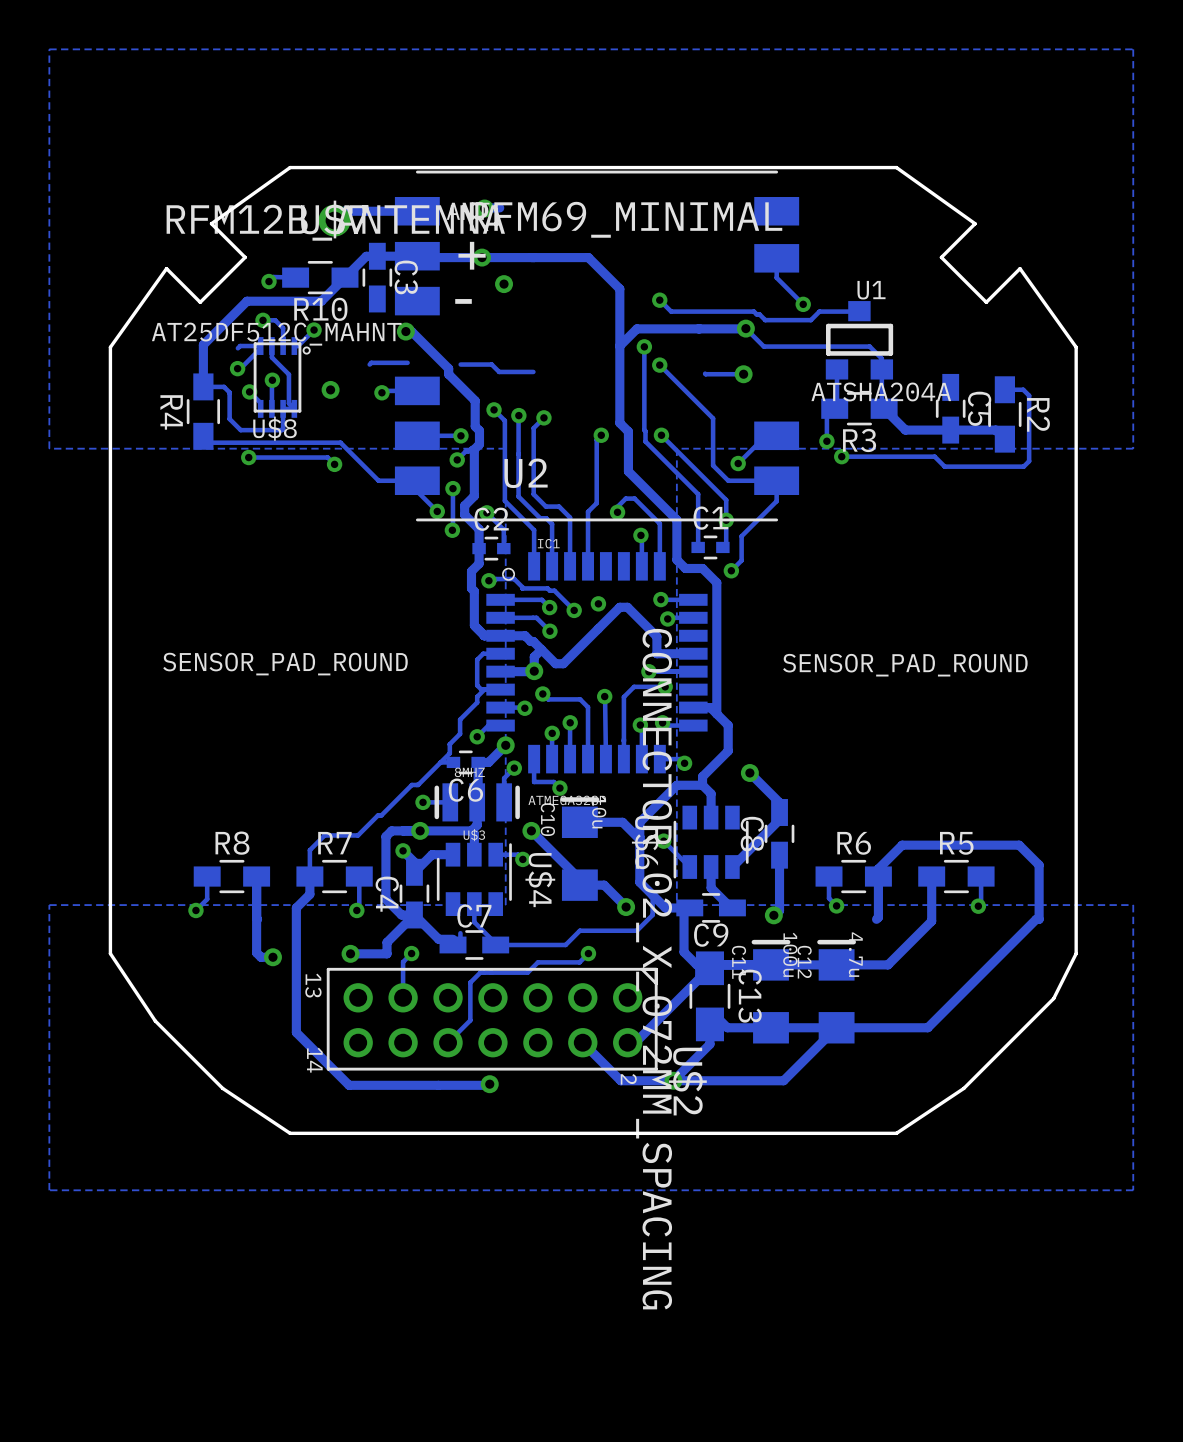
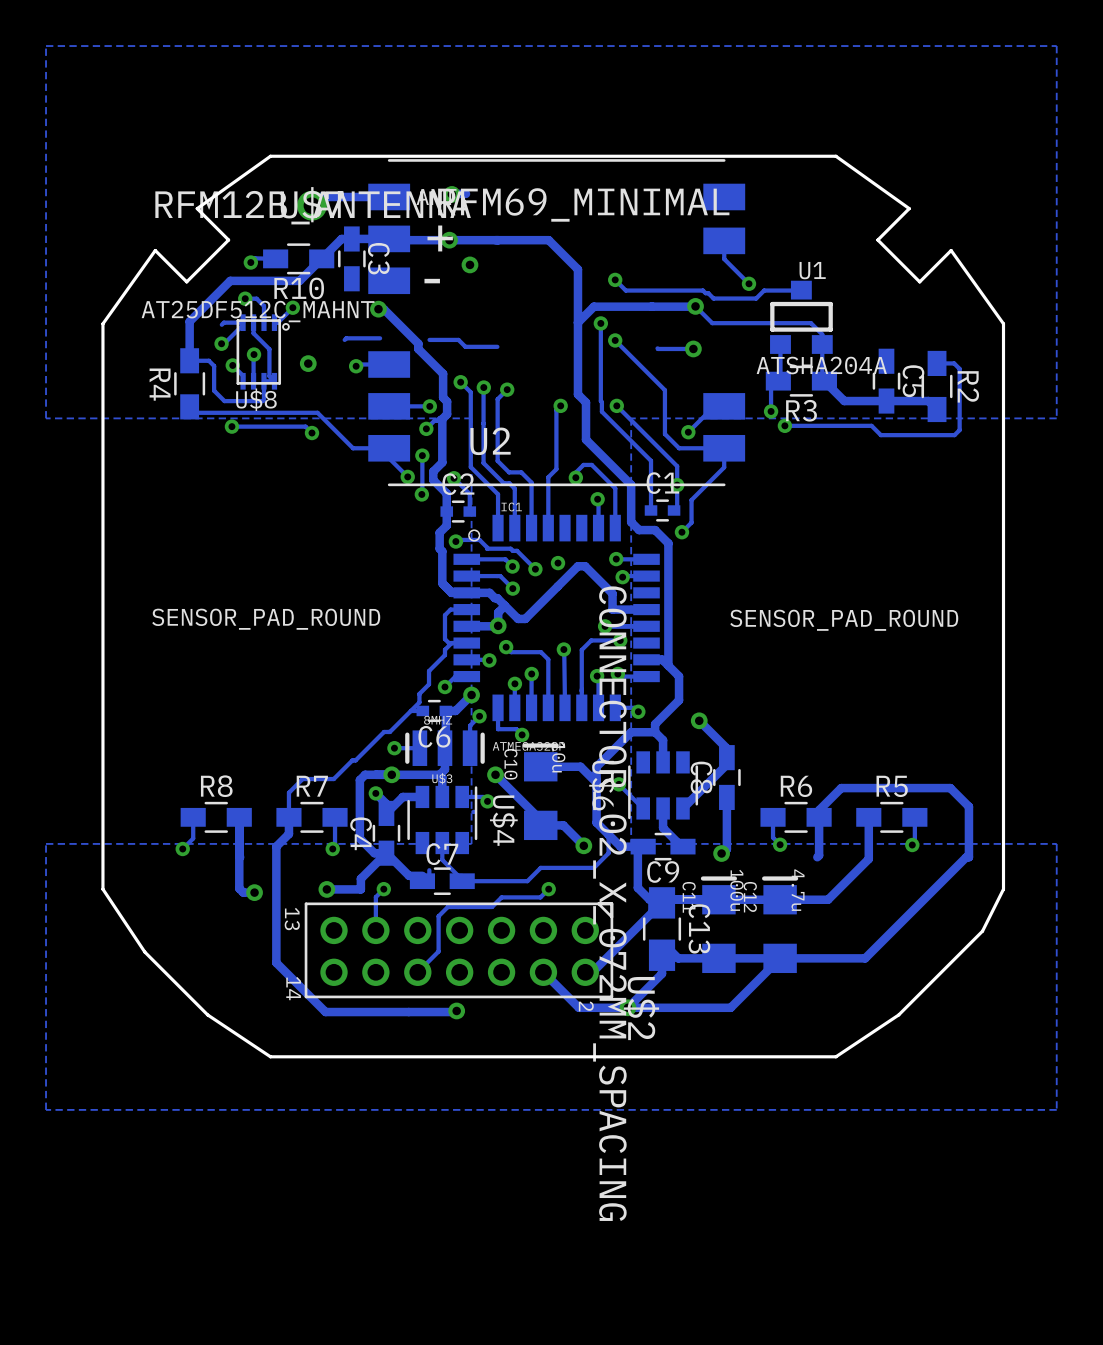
track: none -> (474, 811) (473, 812)

